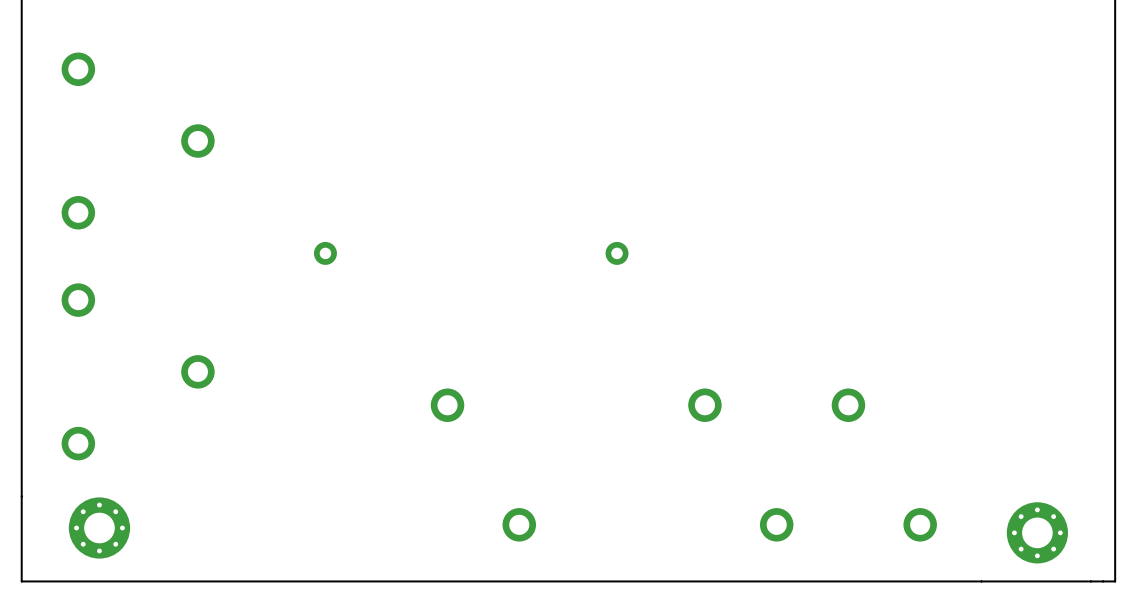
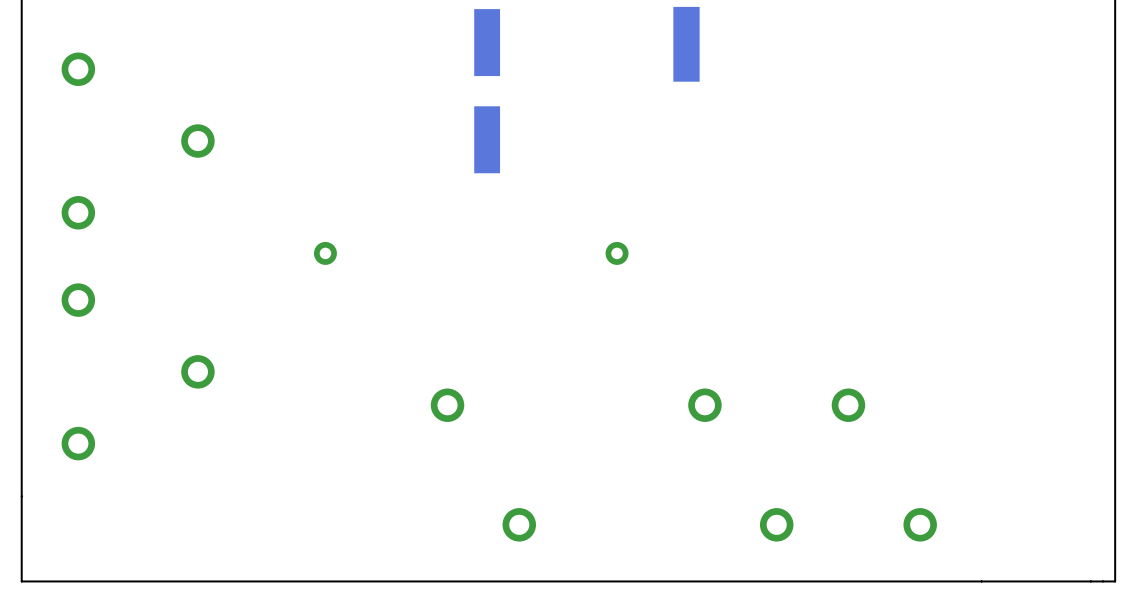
part: none -> (487, 42)
part: none -> (686, 44)
part: none -> (487, 139)
part: (99, 528) -> none
part: (1037, 532) -> none

